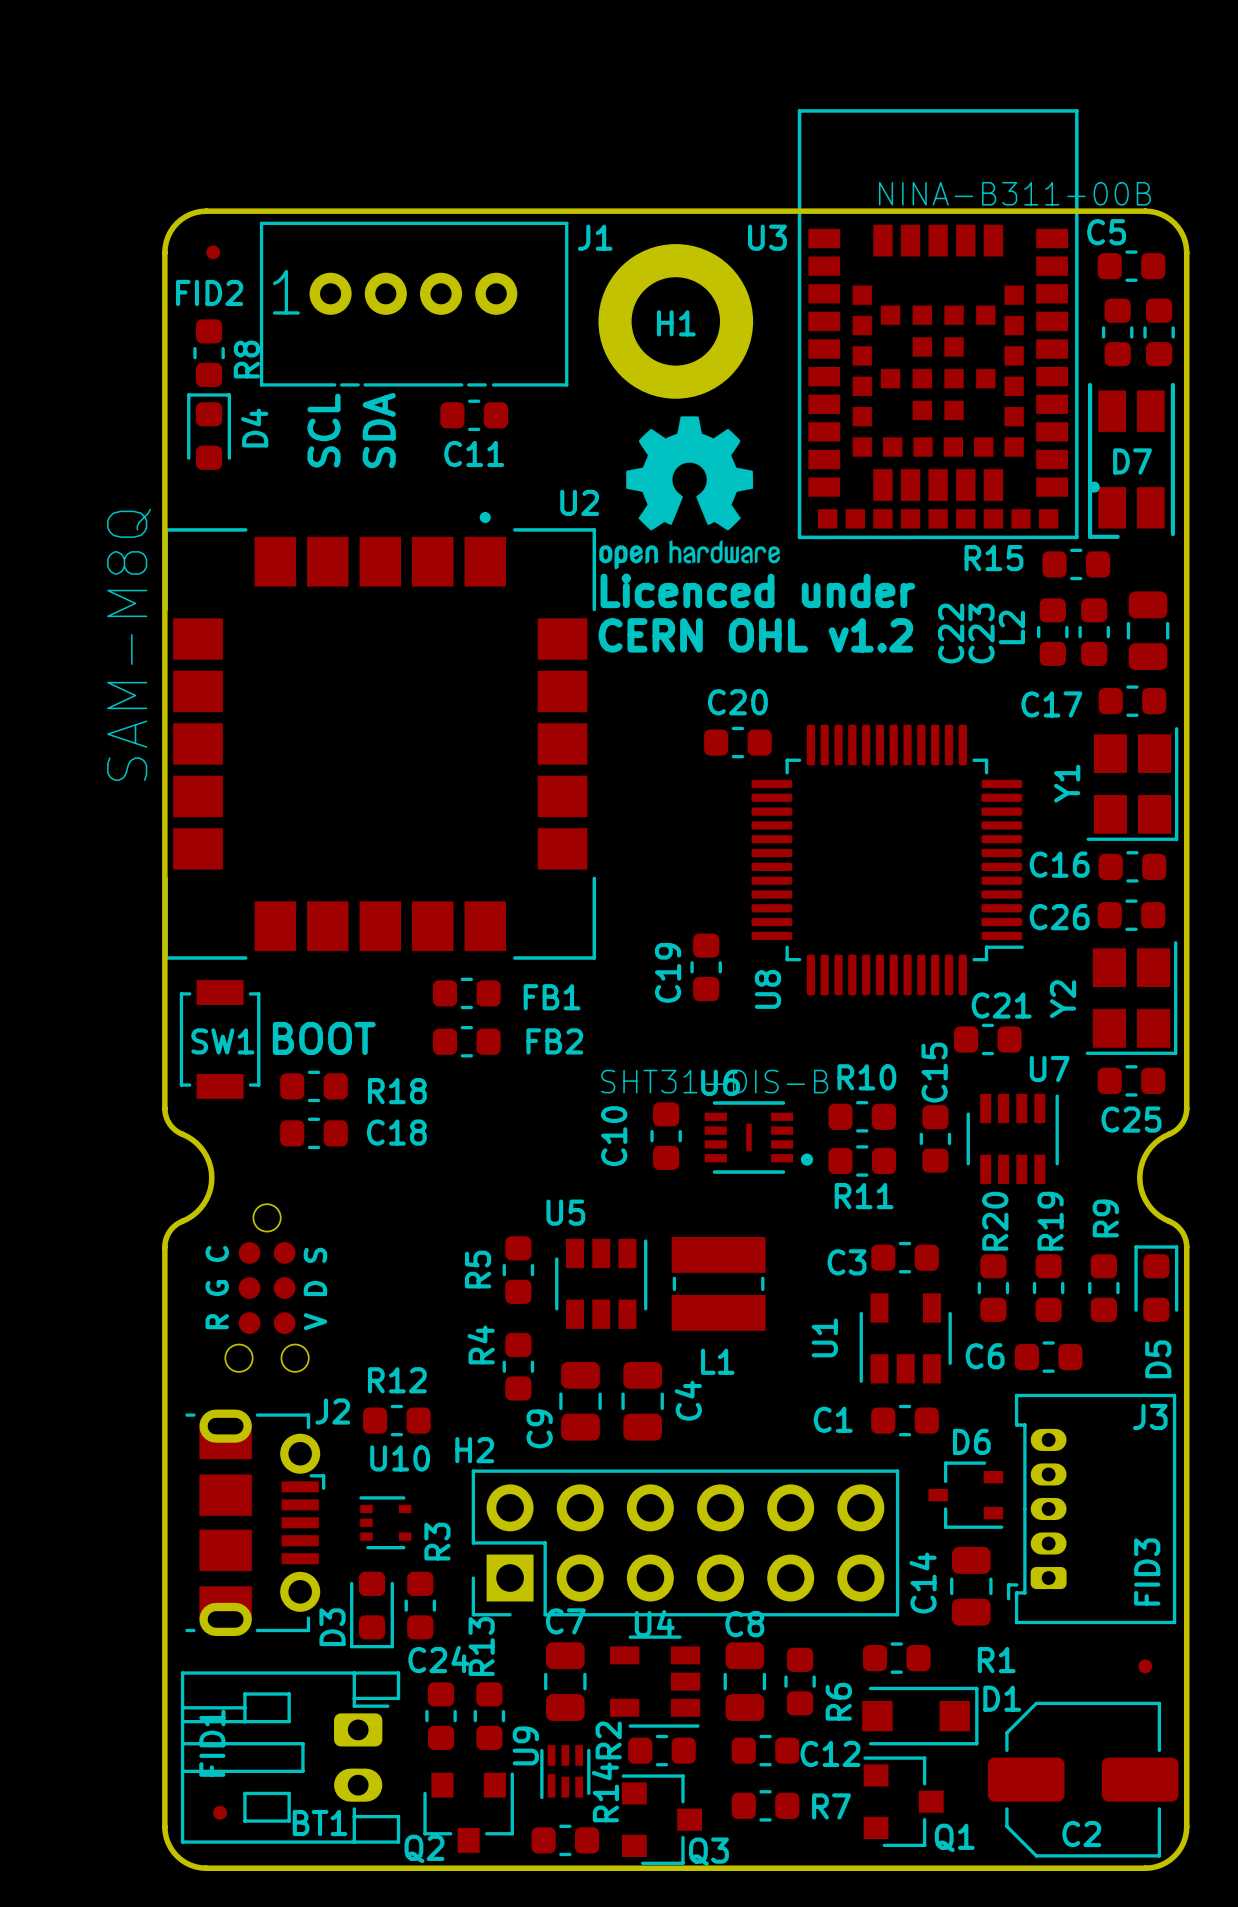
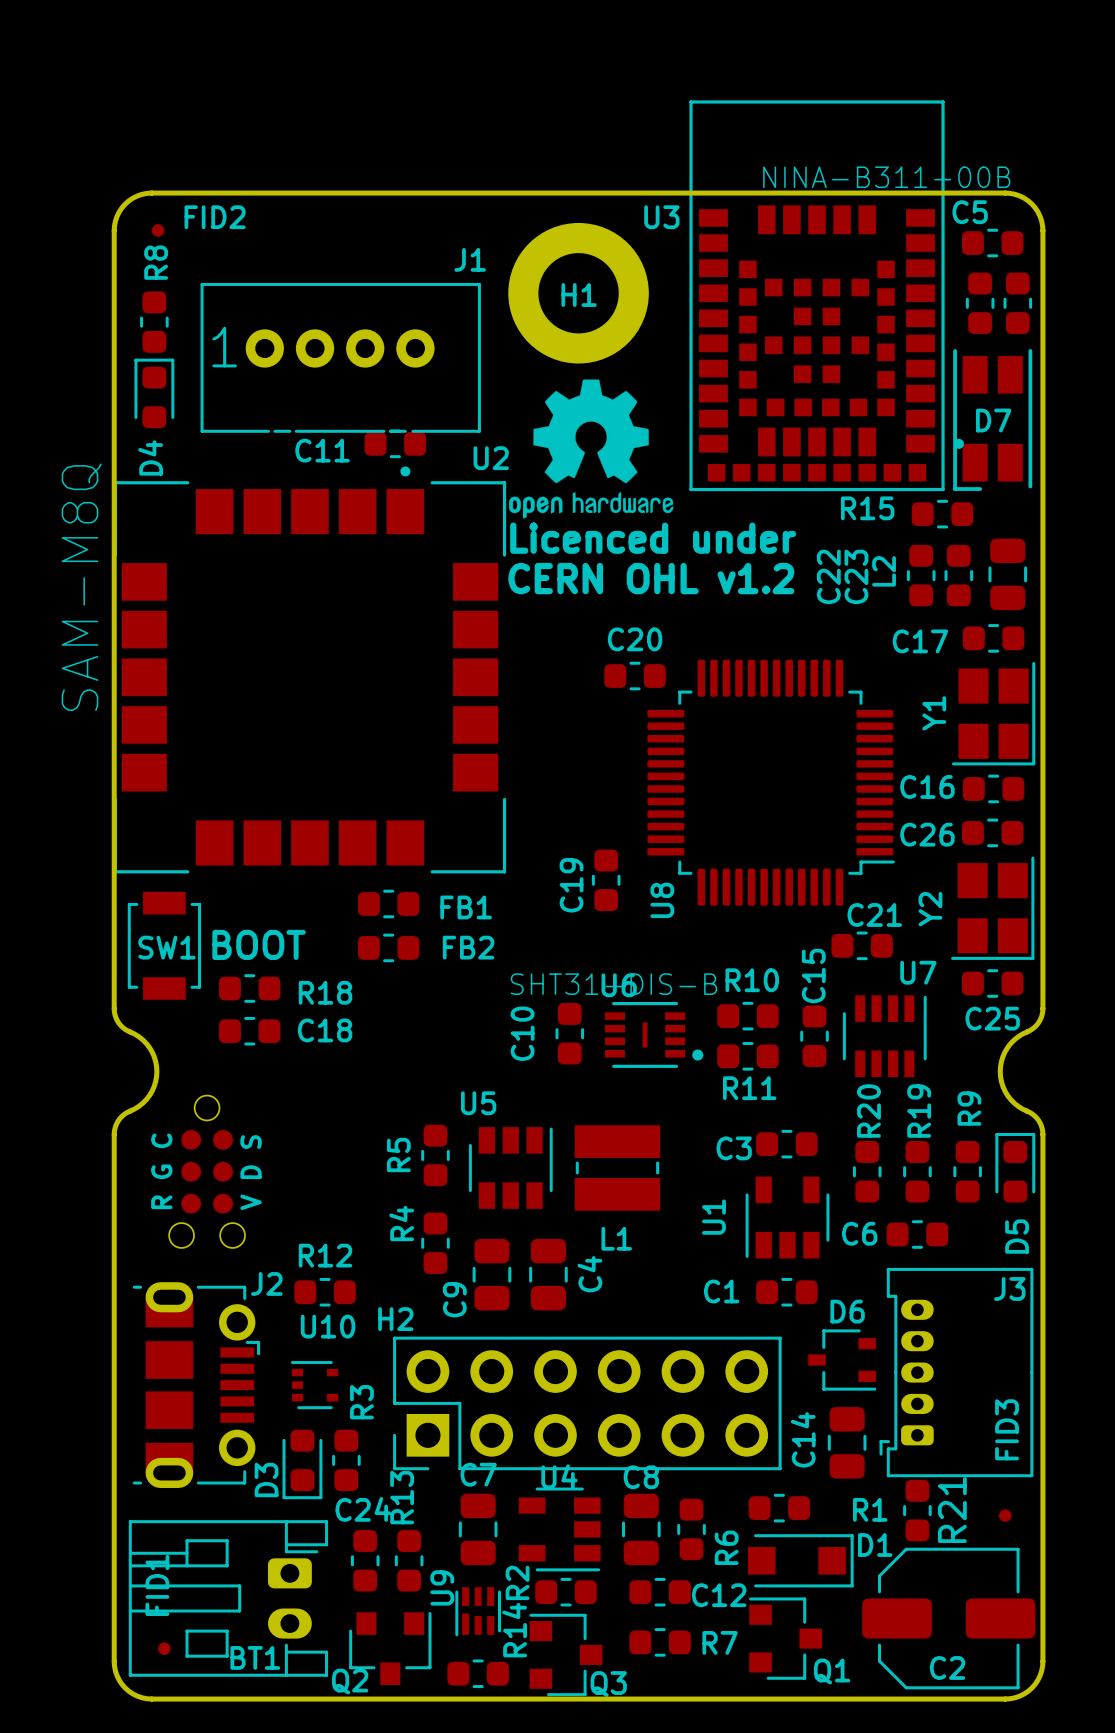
J1 name position: J1 (595, 237) -> J1 (470, 259)
FID2 name position: FID2 (209, 292) -> FID2 (215, 217)
J1 position: (414, 304) -> (340, 357)
R8 name position: R8 (246, 359) -> R8 (156, 262)
C11 position: (474, 415) -> (395, 443)
D4 name position: D4 (254, 428) -> D4 (150, 457)
text: SCL (324, 430) -> none
text: SDA (379, 430) -> none
C11 name position: C11 (474, 453) -> C11 (322, 450)
R21: none -> (917, 1510)

